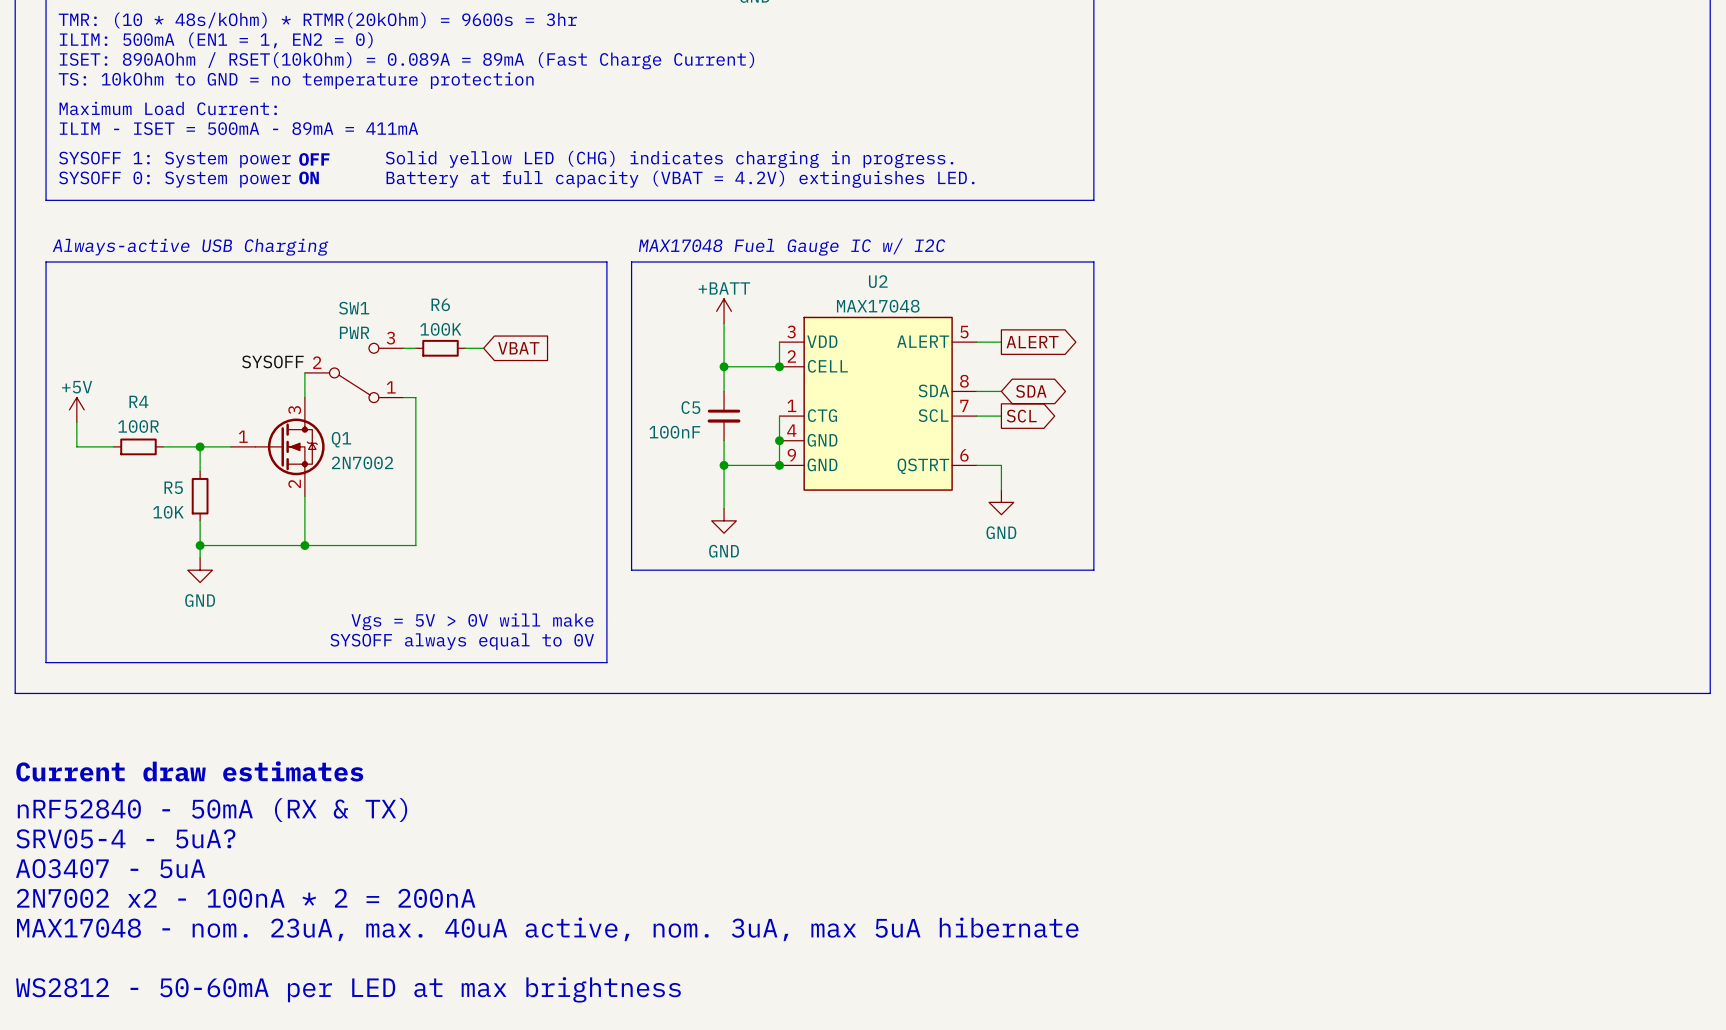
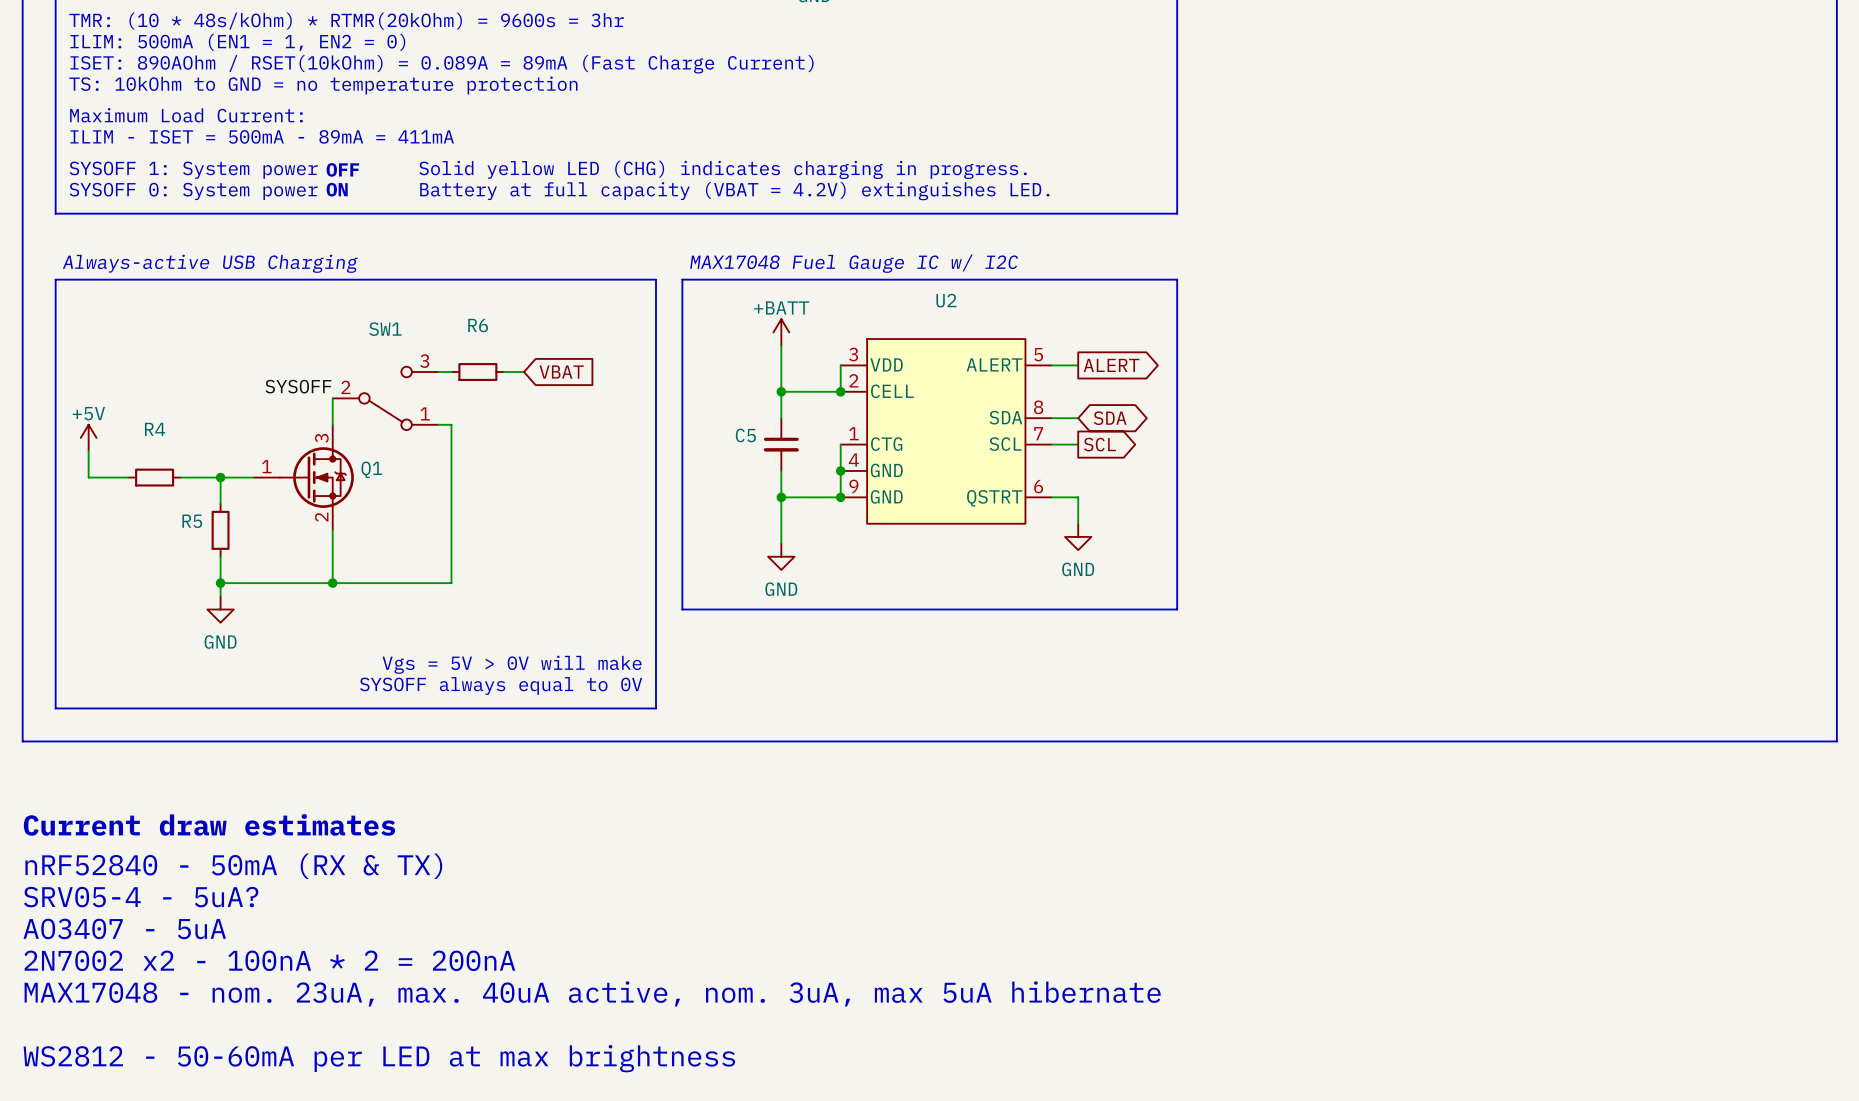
U2 value: MAX17048 (878, 306) -> none
R6 value: 100K (440, 329) -> none
SW1 value: PWR (354, 332) -> none
R4 value: 100R (138, 426) -> none
C5 value: 100nF (674, 432) -> none
Q1 value: 2N7002 (362, 462) -> none
R5 value: 10K (168, 512) -> none

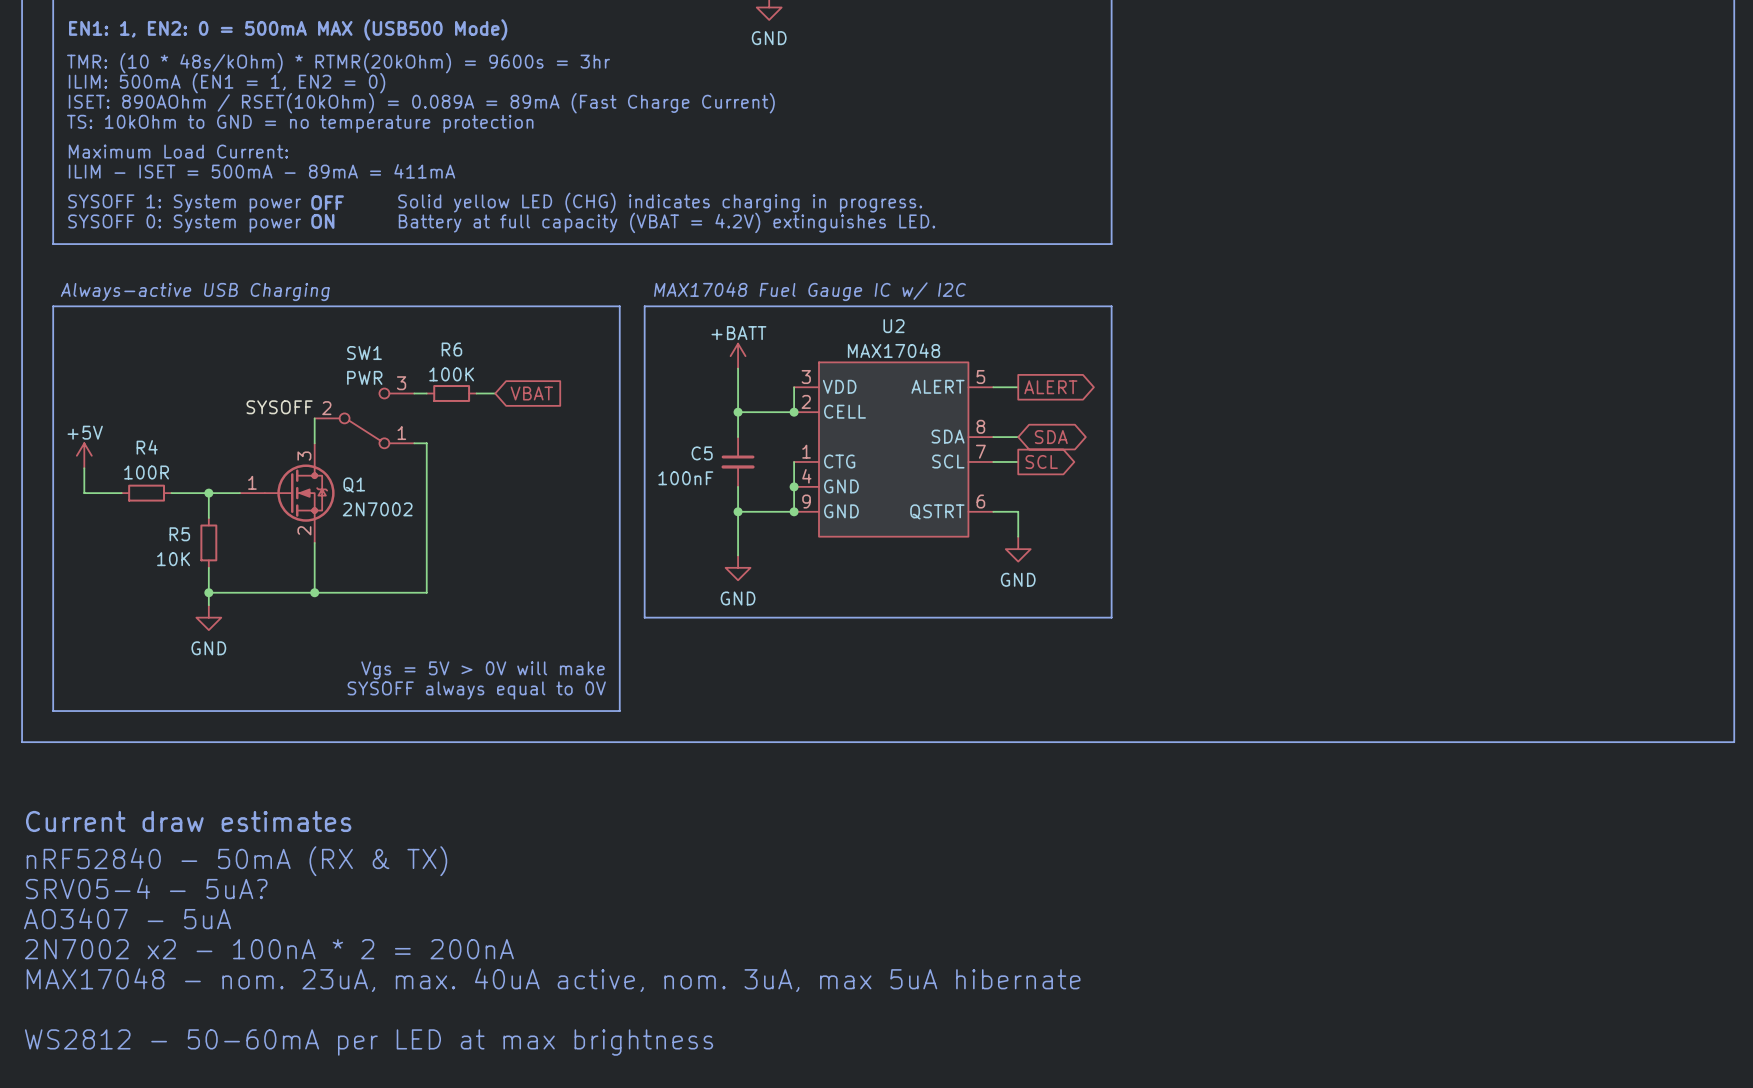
U2 value: none -> MAX17048 (894, 350)
R6 value: none -> 100K (451, 374)
SW1 value: none -> PWR (364, 377)
R4 value: none -> 100R (146, 472)
C5 value: none -> 100nF (685, 478)
Q1 value: none -> 2N7002 (377, 509)
R5 value: none -> 10K (173, 559)

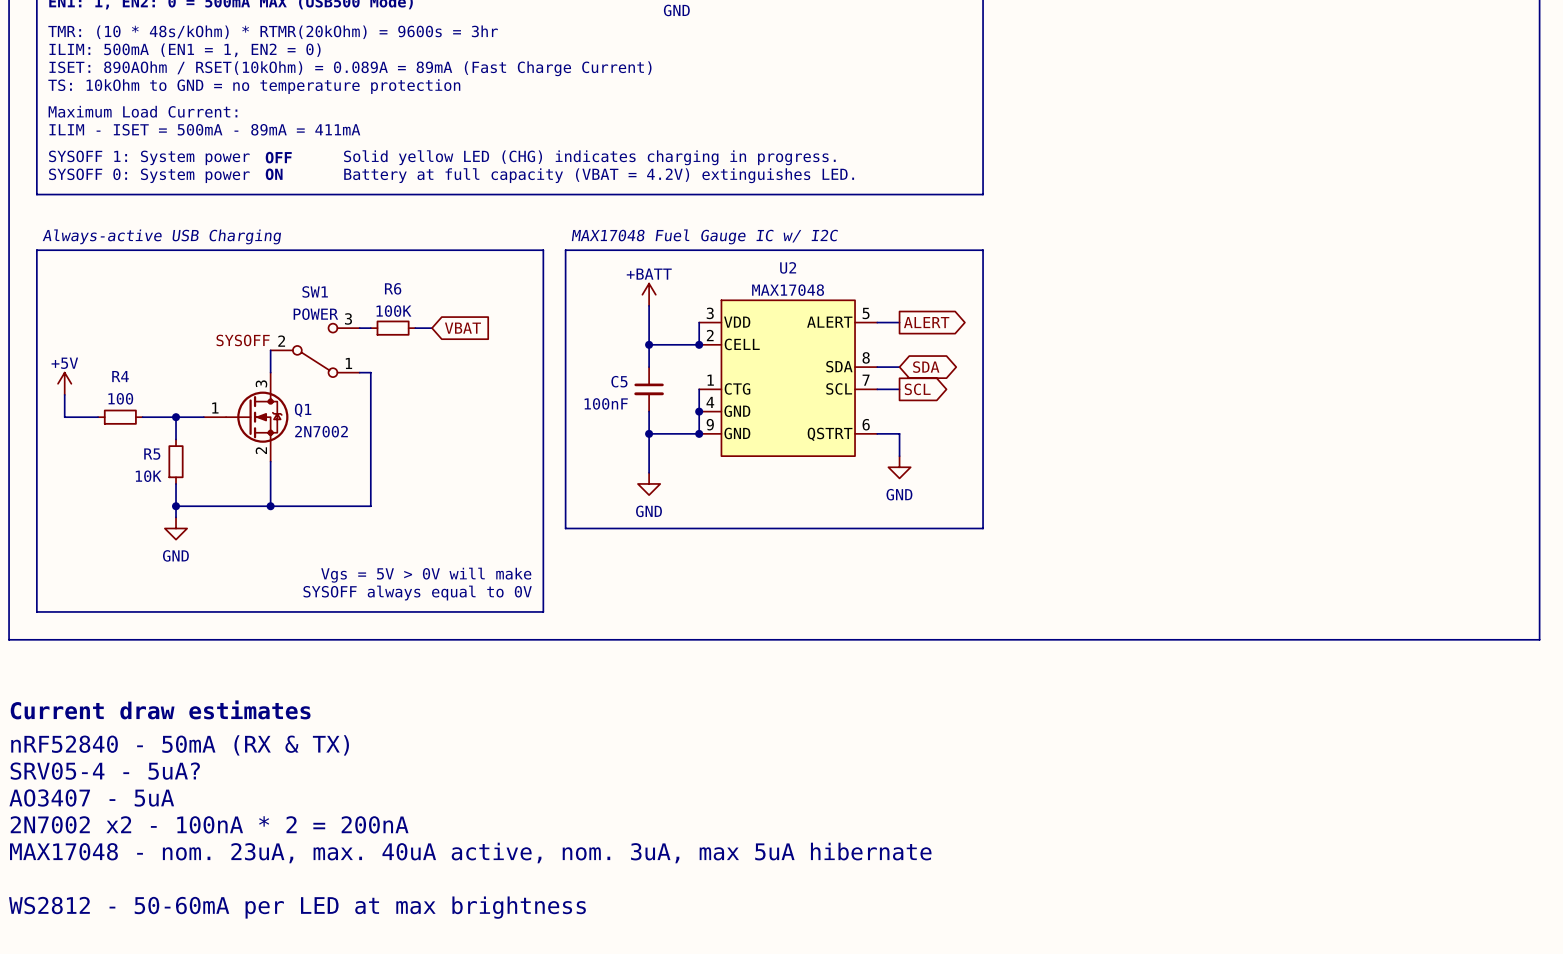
SW1 value: PWR (364, 377) -> POWER (315, 314)
R4 value: 100R (146, 472) -> 100 (120, 398)

